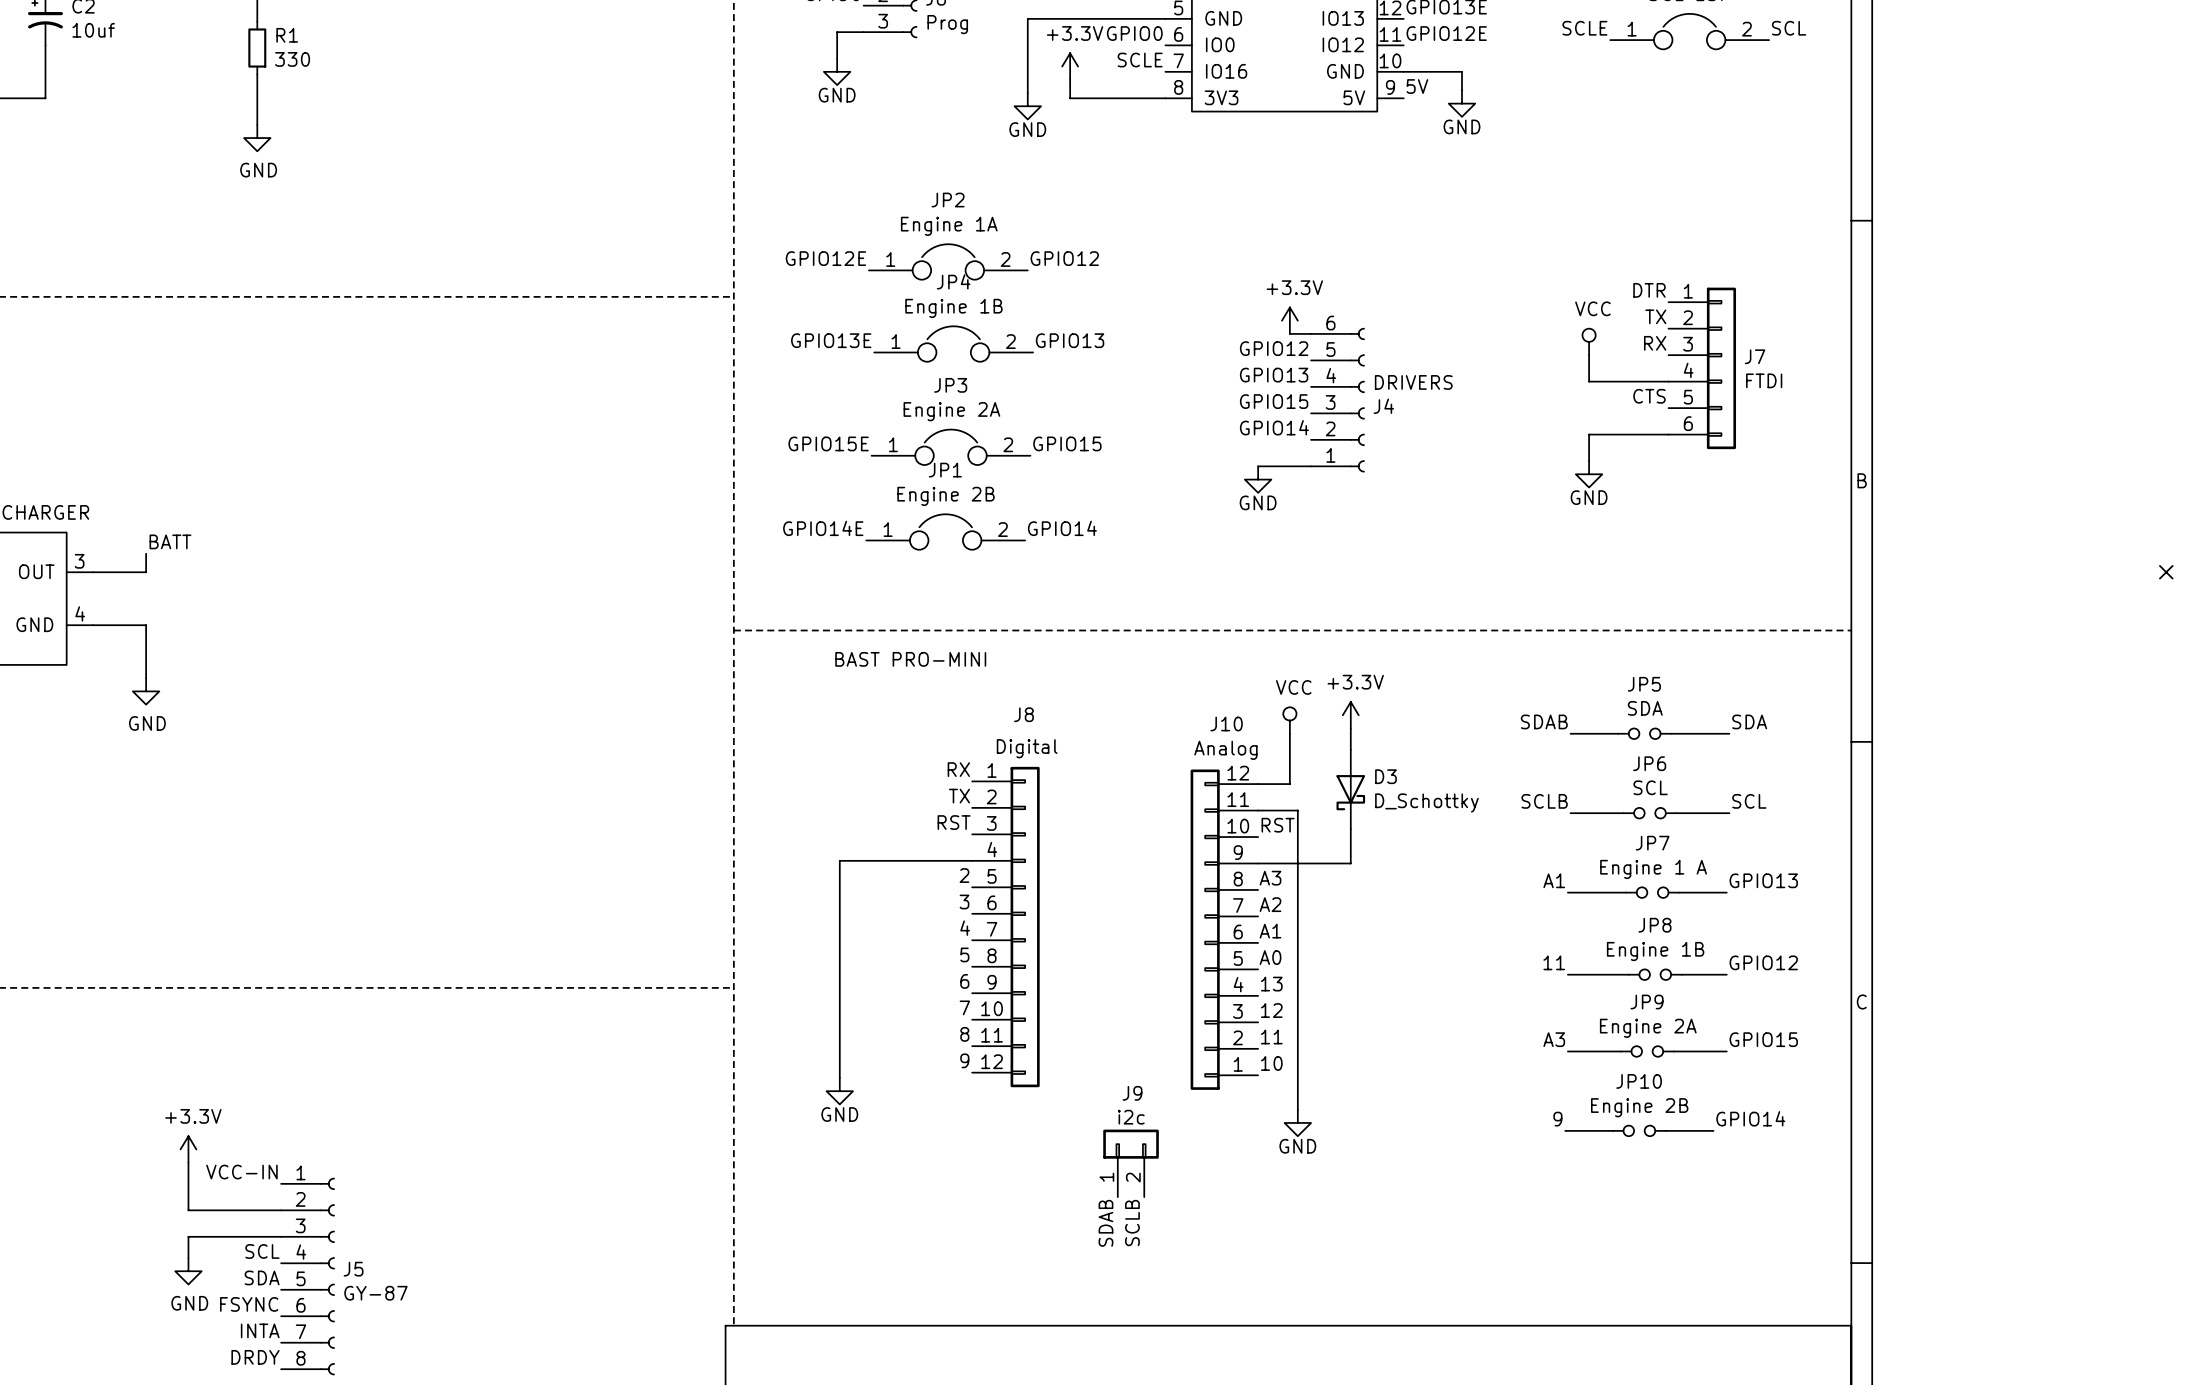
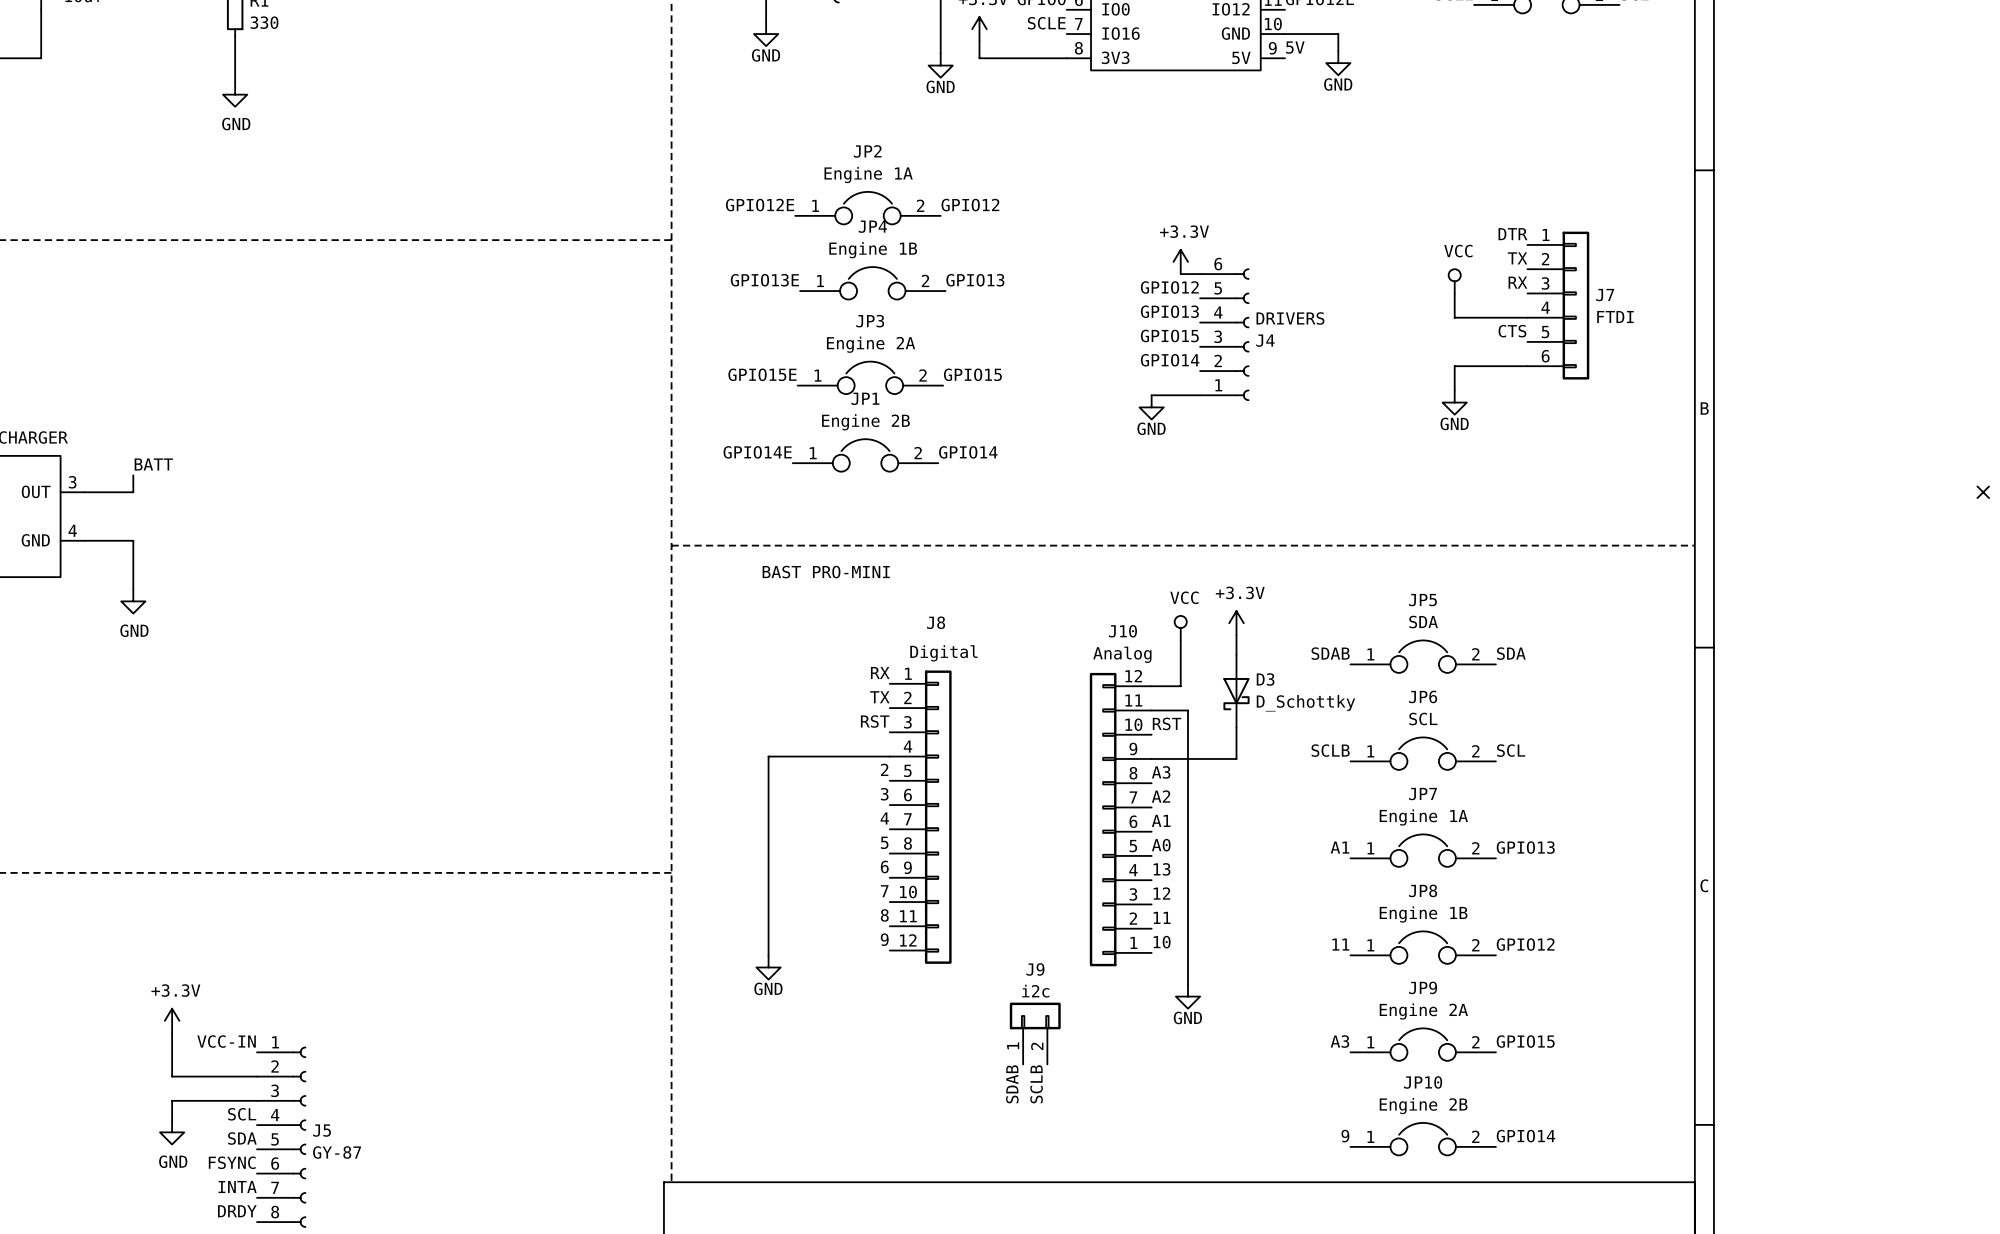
label position: SDAB (1544, 721) -> SDAB (1330, 653)
label position: SDA (1749, 721) -> SDA (1511, 653)
JP5 symbol: [1618, 728, 1672, 740] -> [1350, 640, 1496, 673]
wire: (1570, 733) (1618, 733) -> none
wire: (1671, 733) (1729, 733) -> none
label position: SCLB (1544, 801) -> SCLB (1330, 750)
label position: SCL (1749, 801) -> SCL (1511, 750)
JP6 symbol: [1623, 807, 1677, 819] -> [1350, 737, 1496, 770]
wire: (1570, 813) (1623, 813) -> none
wire: (1676, 813) (1729, 813) -> none
JP7 value: Engine 1 A (1653, 869) -> Engine 1A (1423, 817)
label position: A1 (1554, 880) -> A1 (1340, 847)
label position: GPIO13 (1763, 880) -> GPIO13 (1525, 847)
JP7 symbol: [1626, 887, 1680, 898] -> [1350, 834, 1496, 867]
wire: (1567, 892) (1626, 892) -> none
wire: (1679, 892) (1726, 892) -> none
label position: 11 (1554, 962) -> 11 (1340, 944)
label position: GPIO12 (1763, 962) -> GPIO12 (1525, 944)
JP8 symbol: [1628, 969, 1682, 980] -> [1350, 931, 1496, 964]
wire: (1567, 974) (1628, 974) -> none
wire: (1681, 974) (1726, 974) -> none
label position: A3 (1554, 1039) -> A3 (1339, 1041)
label position: GPIO15 (1763, 1039) -> GPIO15 (1525, 1041)
JP9 symbol: [1620, 1046, 1674, 1057] -> [1350, 1028, 1496, 1061]
wire: (1567, 1051) (1620, 1051) -> none
wire: (1673, 1051) (1726, 1051) -> none
label position: GPIO14 (1750, 1118) -> GPIO14 (1525, 1136)
label position: 9 (1557, 1119) -> 9 (1345, 1136)
JP10 symbol: [1612, 1125, 1666, 1137] -> [1350, 1122, 1496, 1156]
wire: (1565, 1130) (1612, 1130) -> none
wire: (1665, 1130) (1713, 1130) -> none

